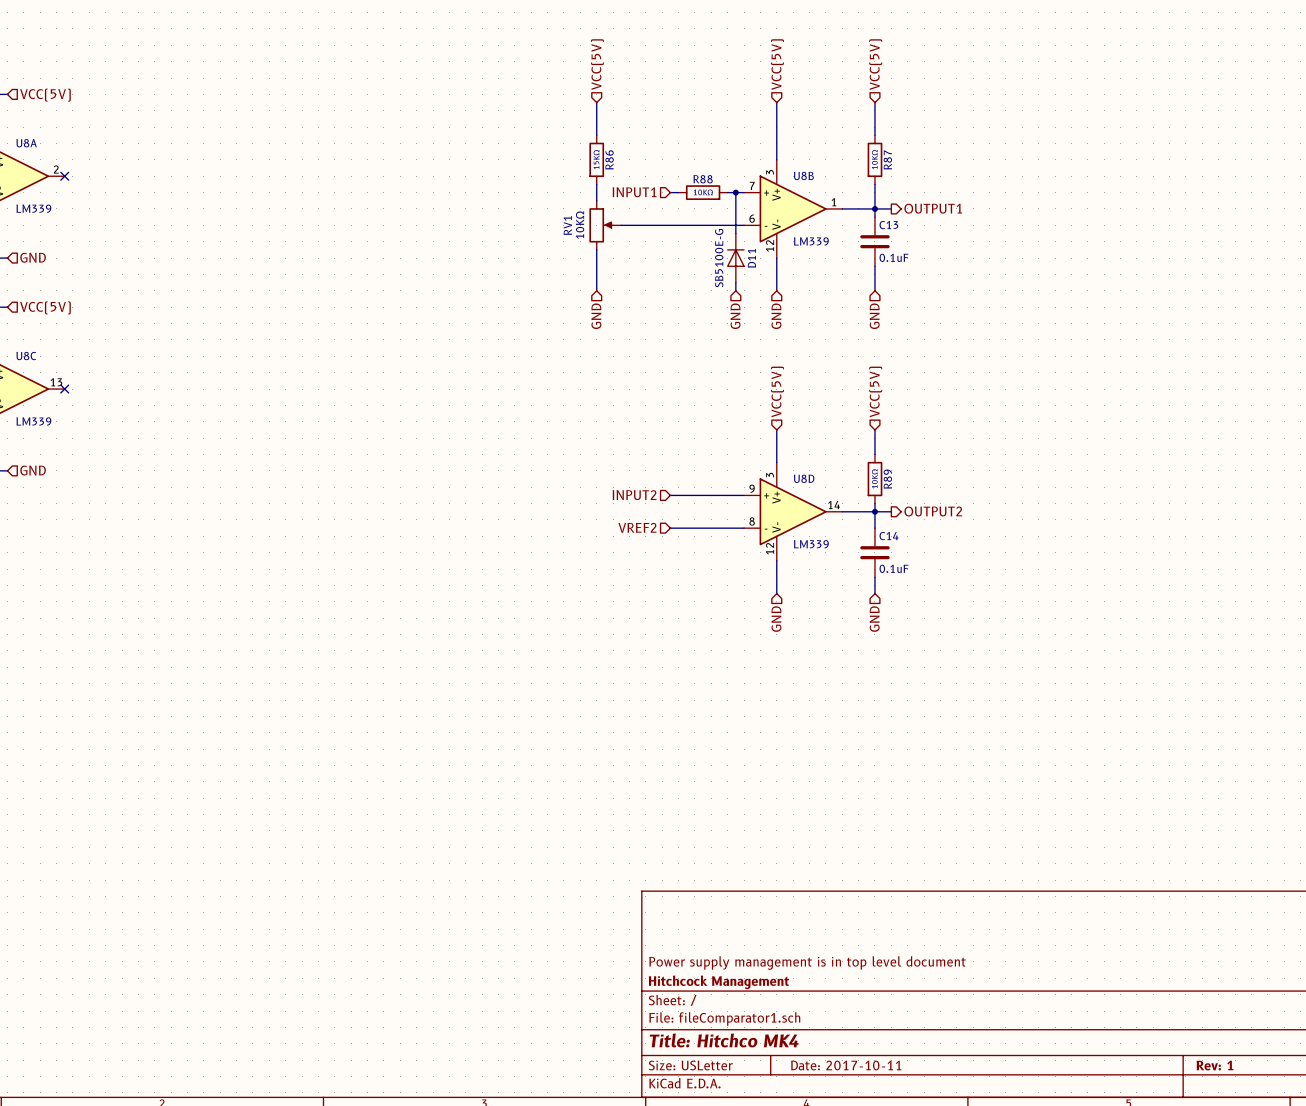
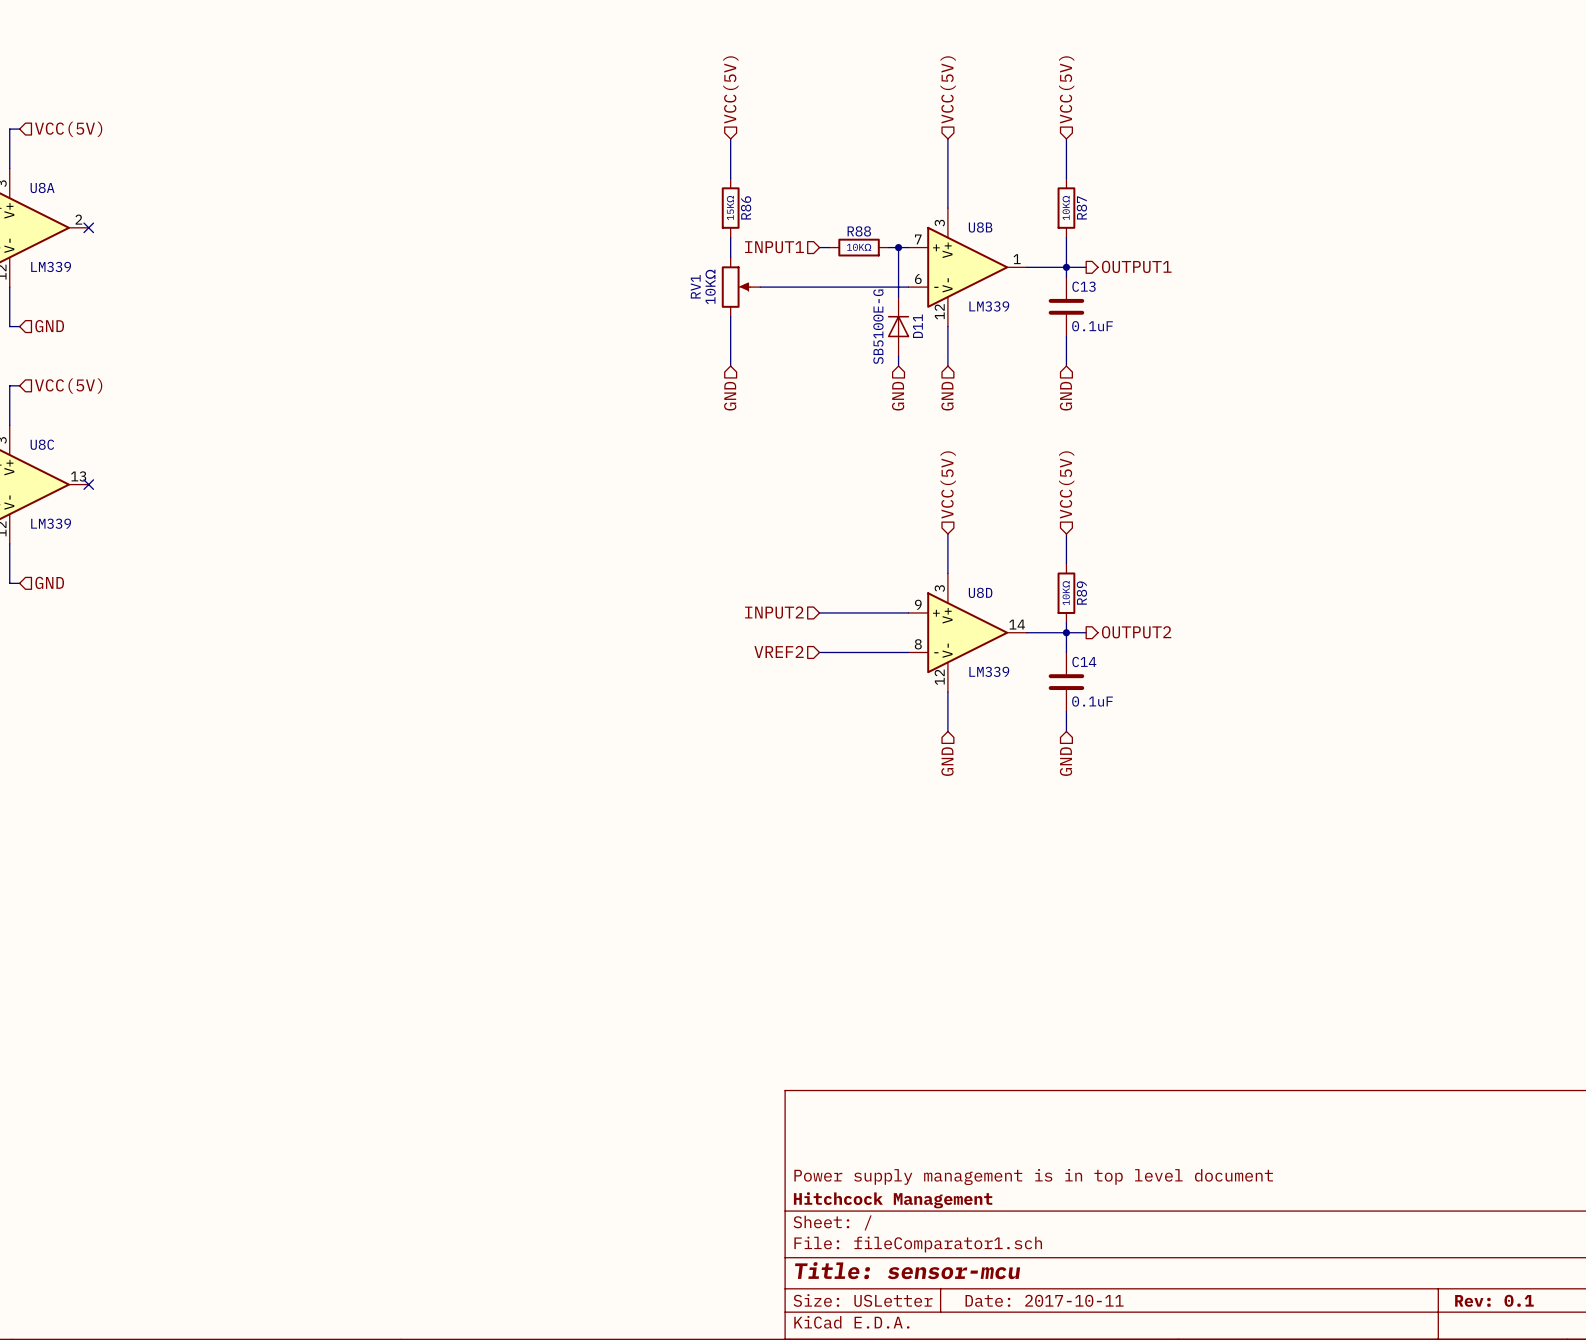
title block: Title: Hitchco MK4 (724, 1040) -> Title: sensor-mcu (907, 1270)
title block: Rev: 1 (1214, 1065) -> Rev: 0.1 (1494, 1300)

